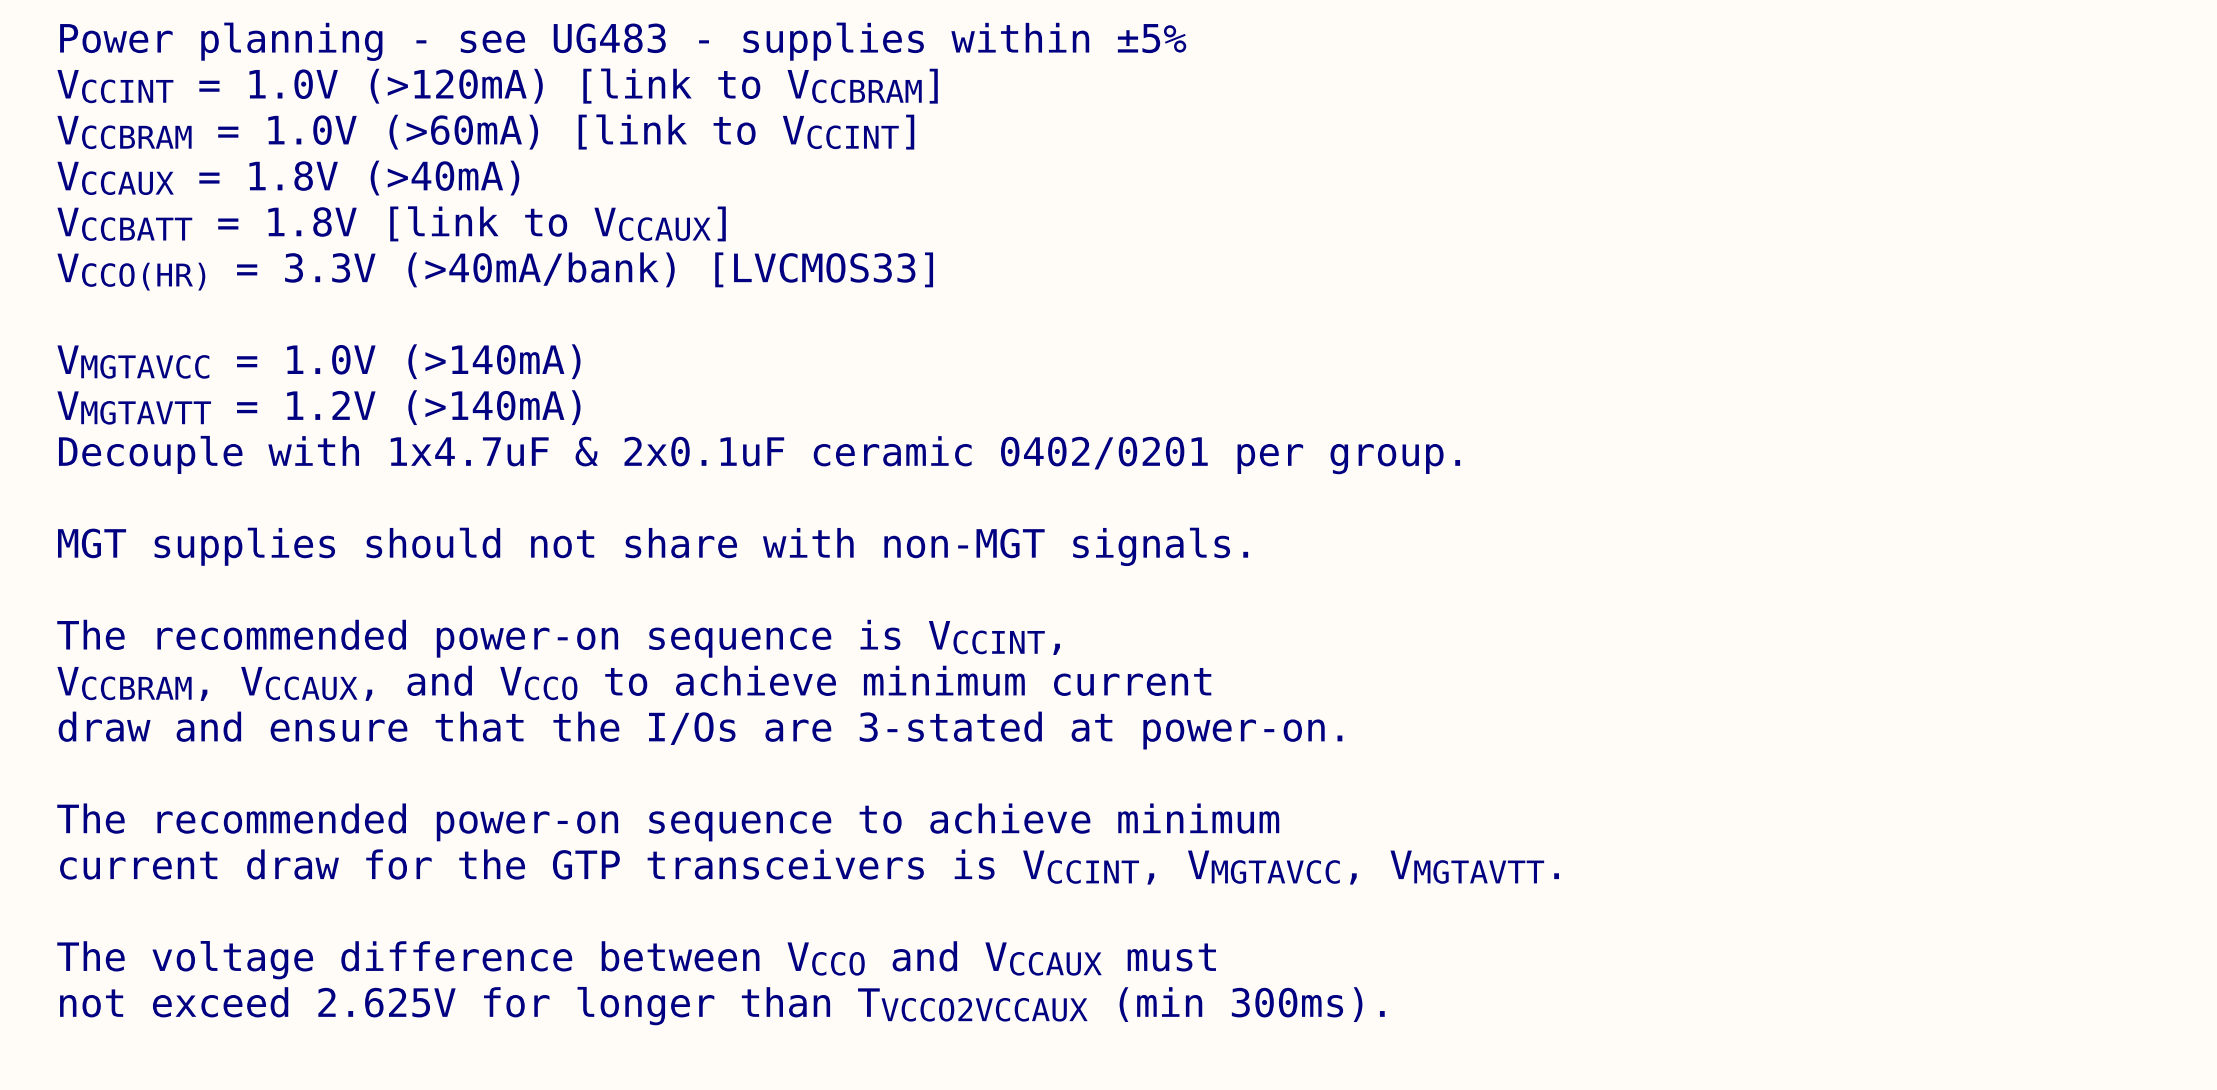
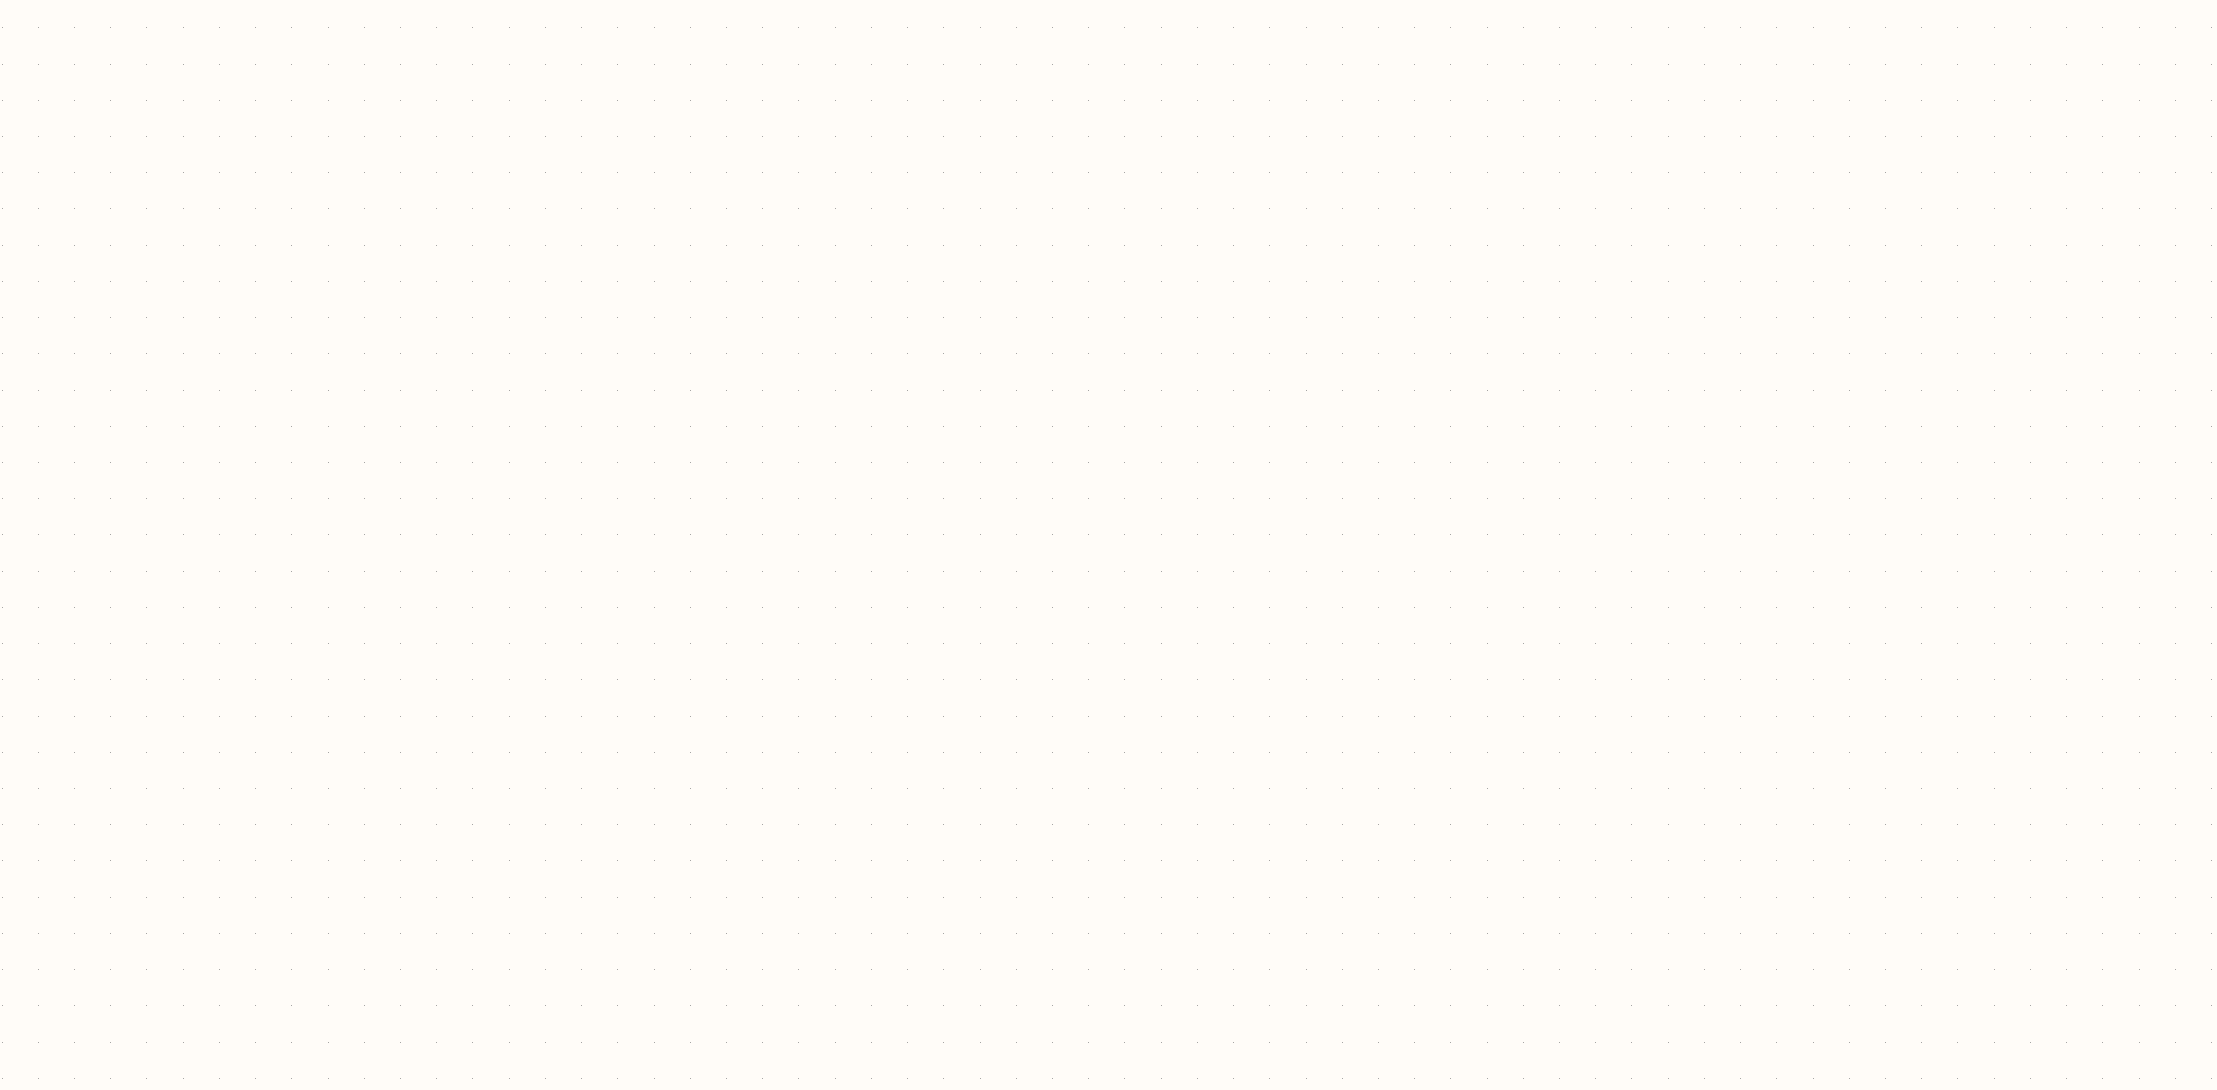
text: Power planning - see UG483 - supplies within ±5% (623, 41) -> none
text: VCCINT = 1.0V (>120mA) [link to VCCBRAM] (497, 86) -> none
text: VCCBRAM = 1.0V (>60mA) [link to VCCINT] (485, 132) -> none
text: VCCAUX = 1.8V (>40mA) (288, 178) -> none
text: VCCBATT = 1.8V [link to VCCAUX] (391, 223) -> none
text: VCCO(HR) = 3.3V (>40mA/bank) [LVCMOS33] (495, 271) -> none
text: VMGTAVCC = 1.0V (>140mA) (318, 361) -> none
text: VMGTAVTT = 1.2V (>140mA) (318, 407) -> none
text: Decouple with 1x4.7uF & 2x0.1uF ceramic 0402/0201 per group. (759, 455) -> none
text: MGT supplies should not share with non-MGT signals. (653, 546) -> none
text: The recommended power-on sequence is VCCINT, (558, 638) -> none
text: VCCBRAM, VCCAUX, and VCCO to achieve minimum current (634, 683) -> none
text: draw and ensure that the I/Os are 3-stated at power-on. (700, 730) -> none
text: The recommended power-on sequence to achieve minimum (668, 822) -> none
text: current draw for the GTP transceivers is VCCINT, VMGTAVCC, VMGTAVTT. (809, 866) -> none
text: The voltage difference between VCCO and VCCAUX must (636, 960) -> none
text: not exceed 2.625V for longer than TVCCO2VCCAUX (min 300ms). (722, 1006) -> none

